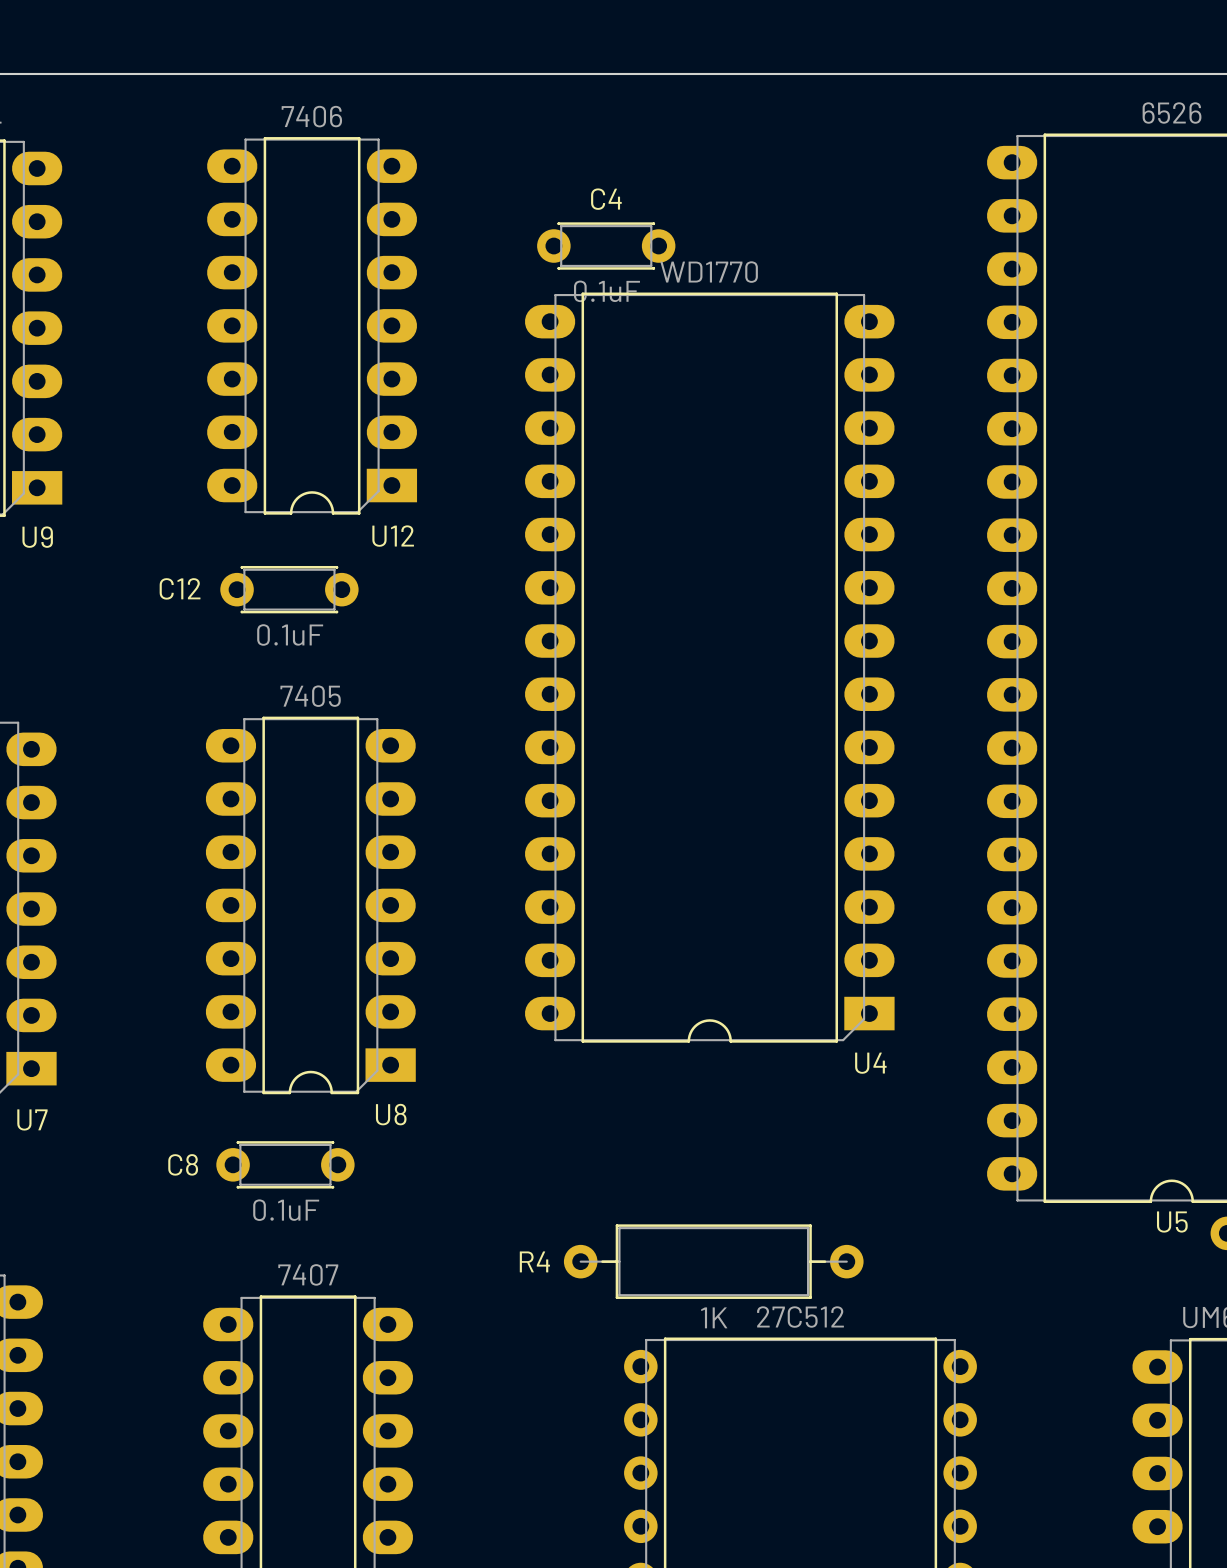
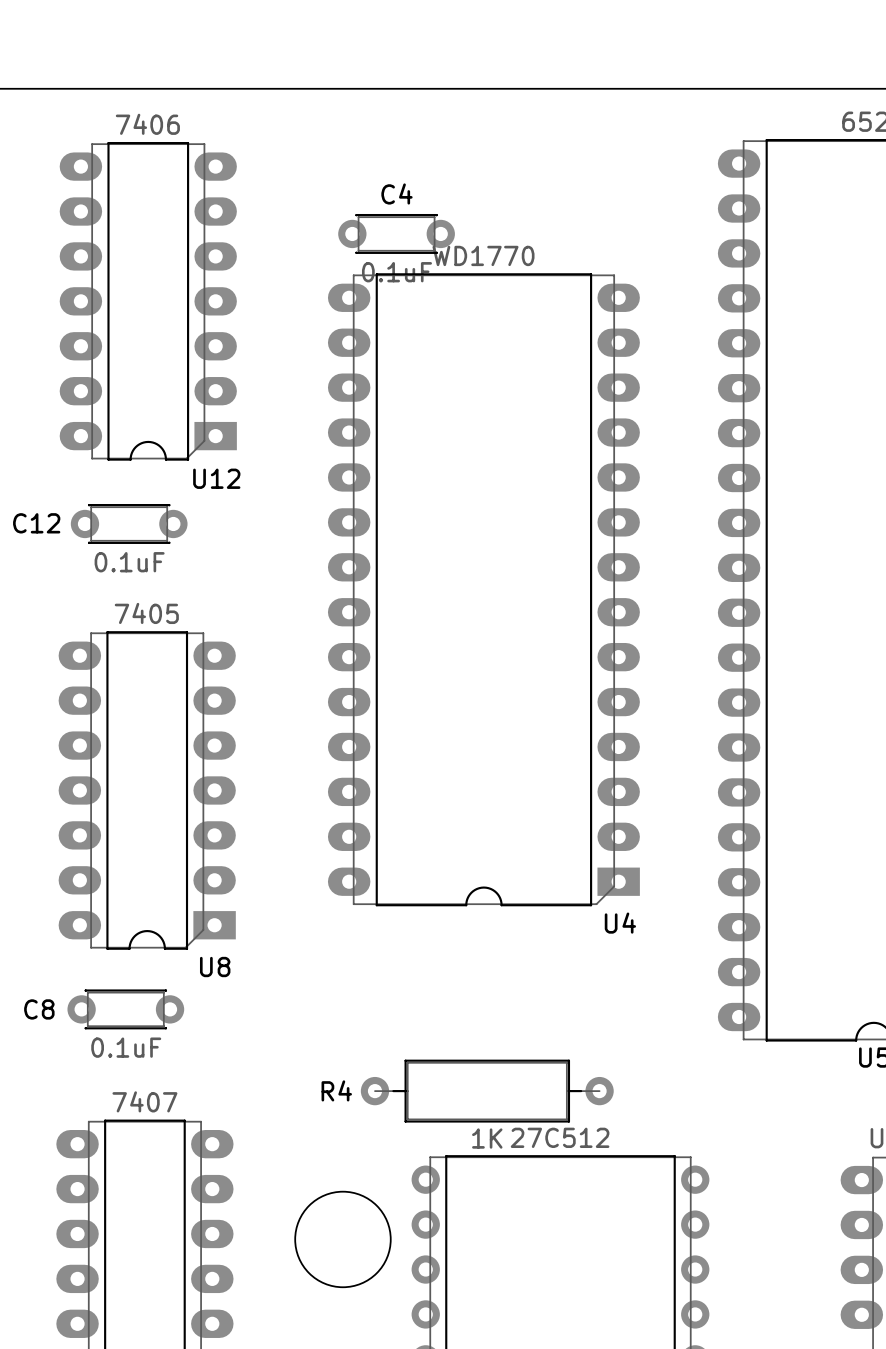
round board edge: none -> [294, 1190, 392, 1289]

